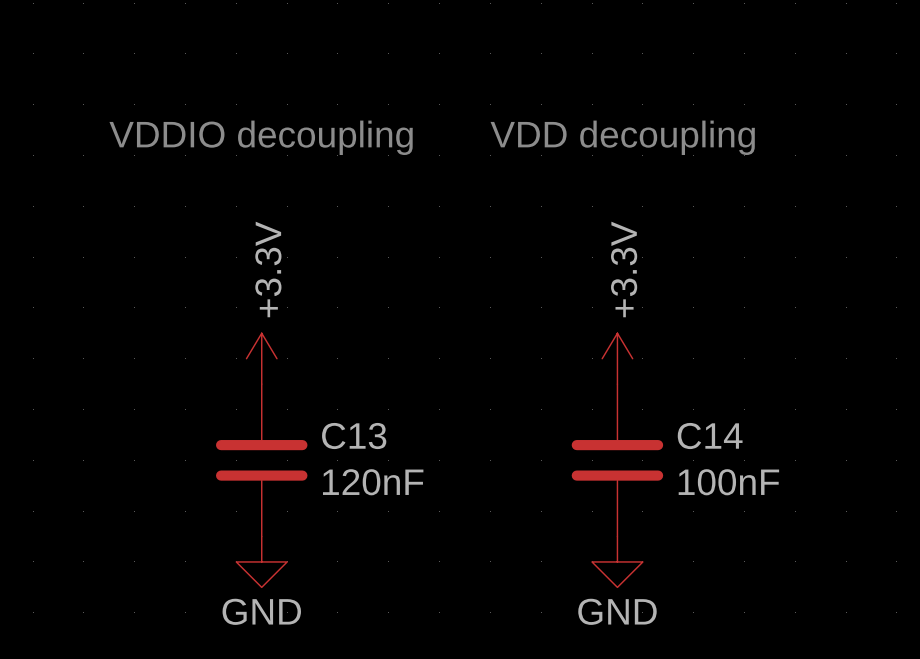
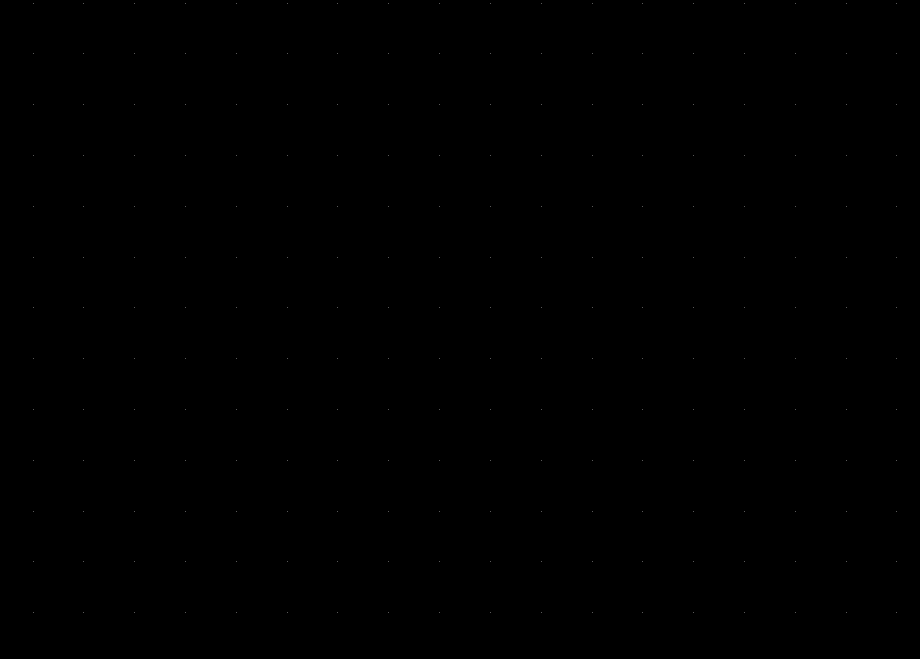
text: VDDIO decoupling (261, 137) -> none
text: VDD decoupling (622, 137) -> none
power symbol: +3.3V (261, 358) -> none
power symbol: +3.3V (617, 358) -> none
C13: 120nF (261, 460) -> none
C14: 100nF (617, 460) -> none
power symbol: GND (261, 561) -> none
power symbol: GND (617, 561) -> none

